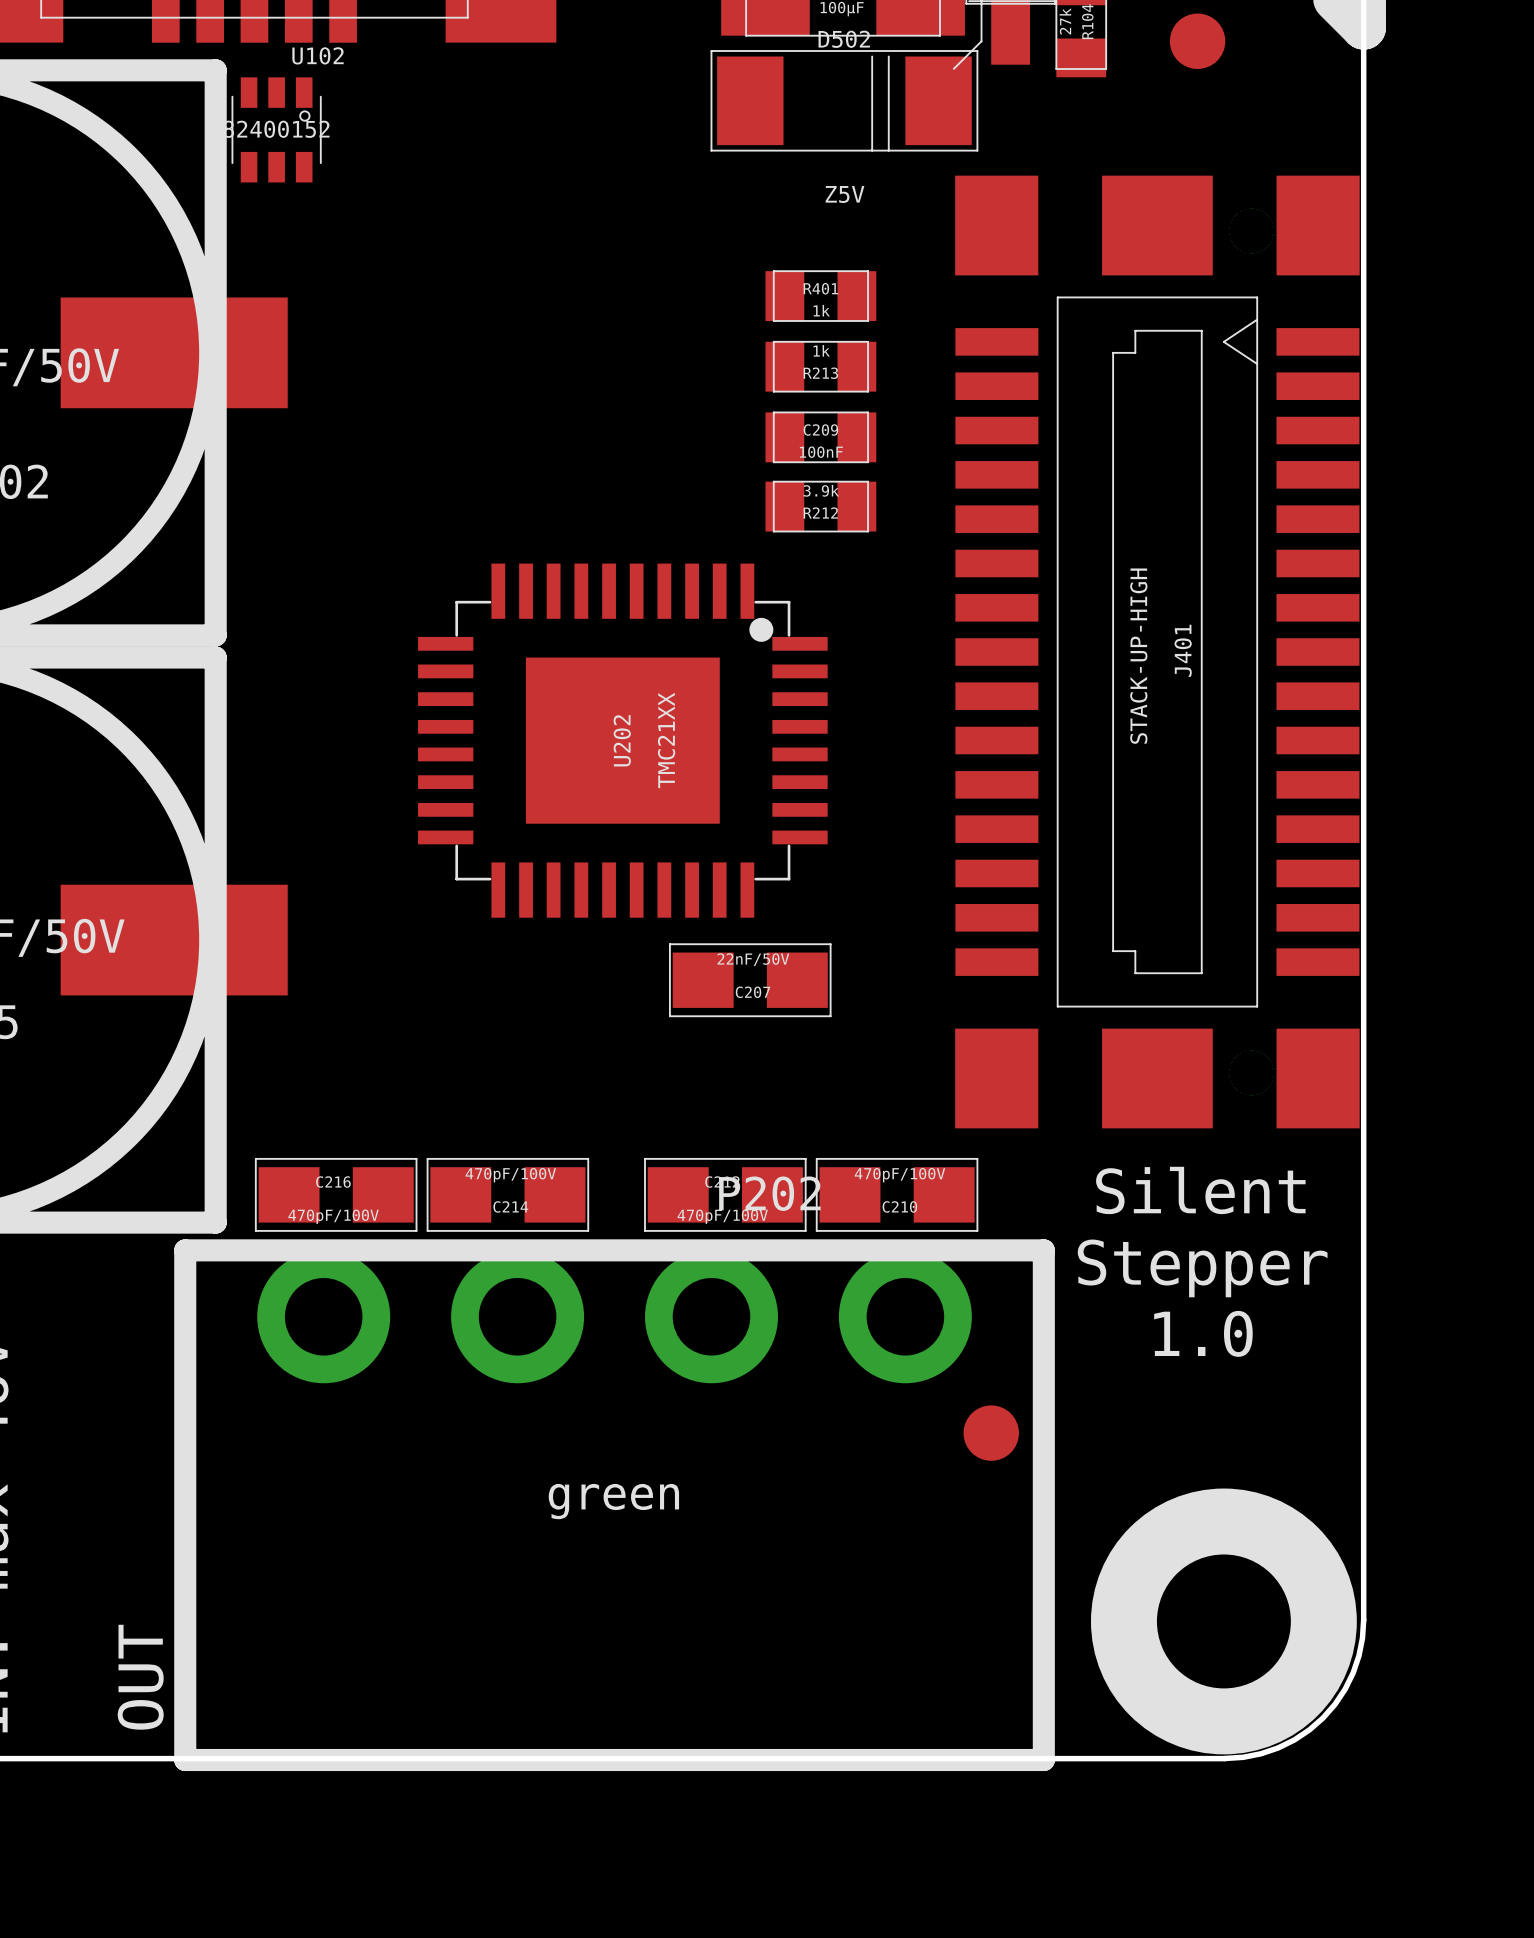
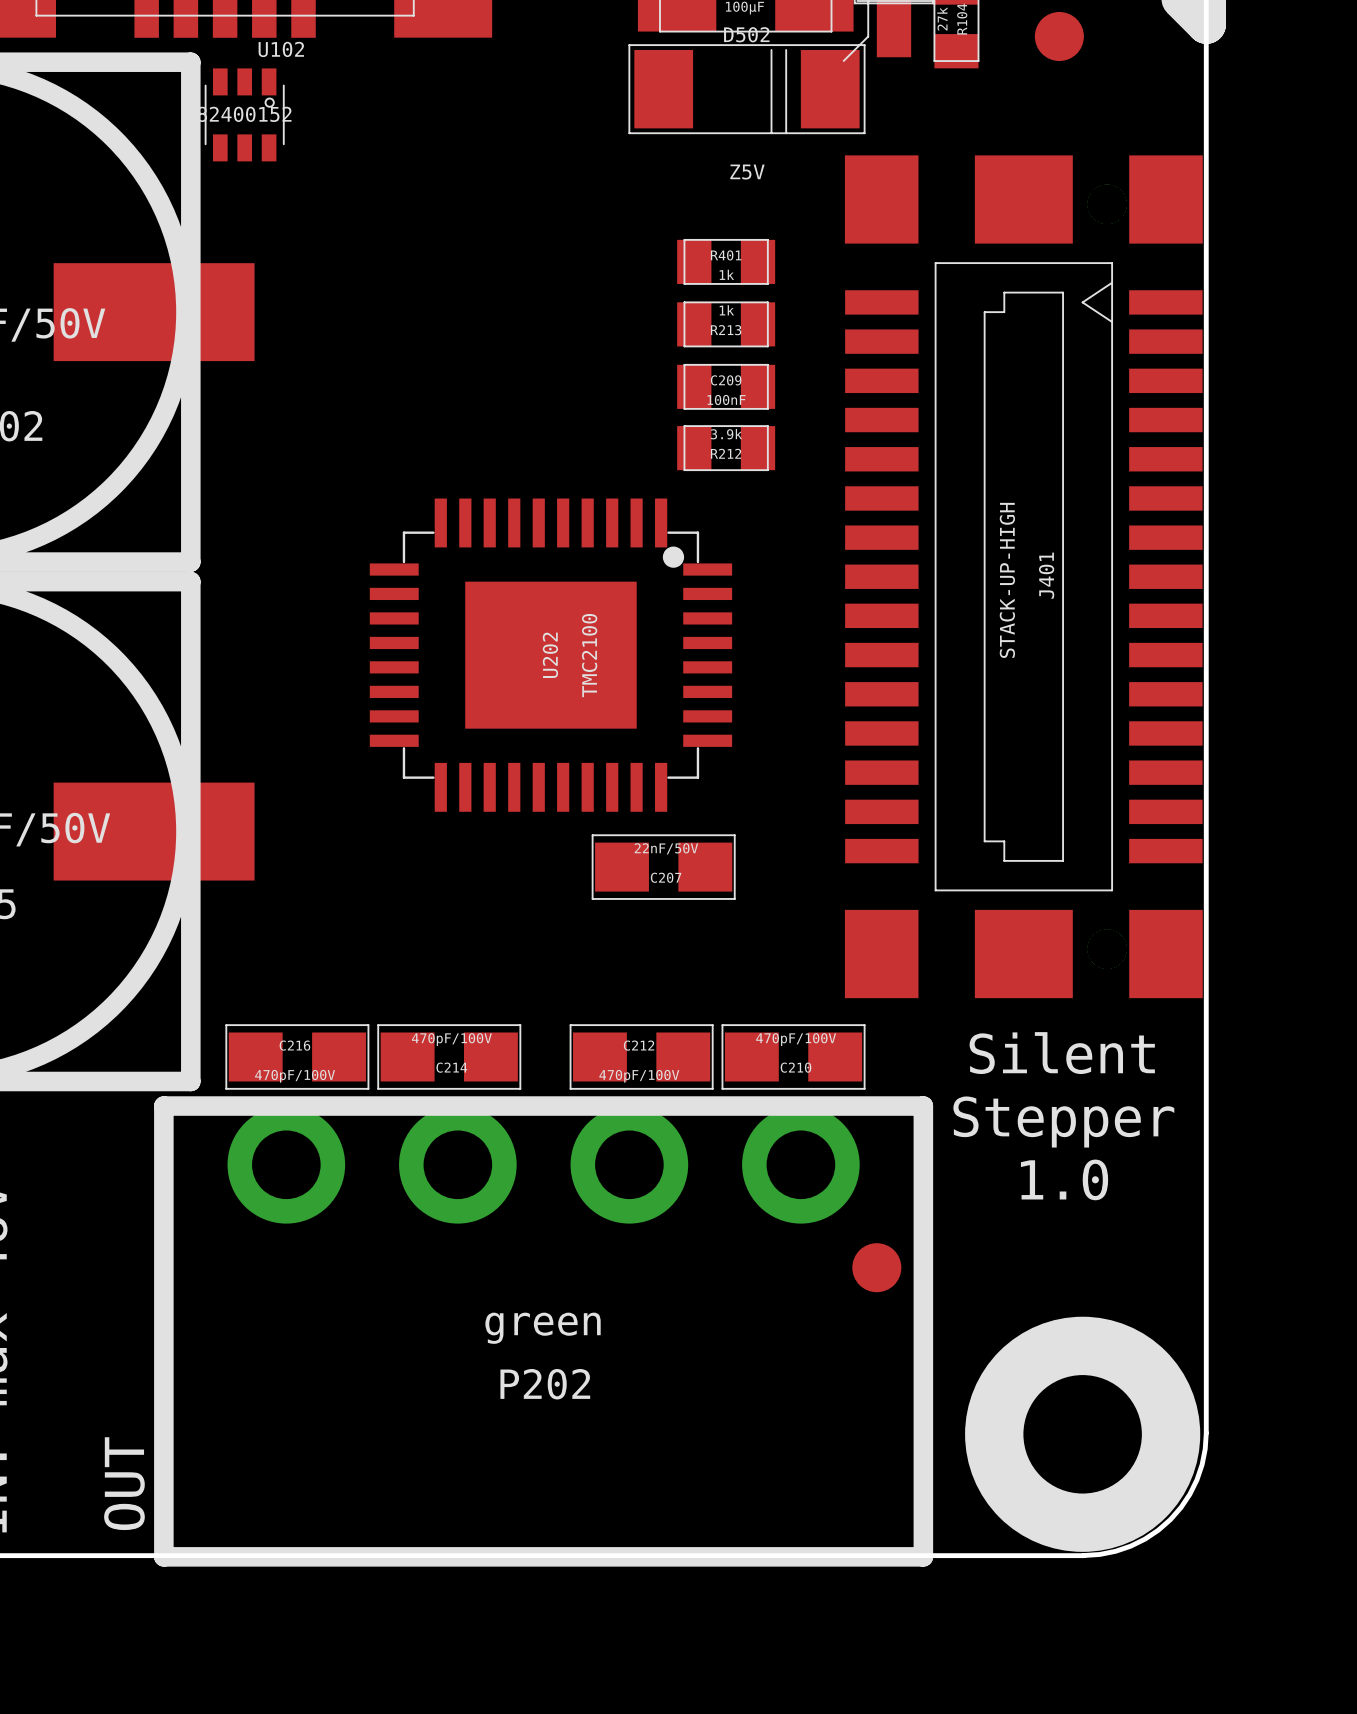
U202 value: TMC21XX (666, 740) -> TMC2100 (589, 655)
P202 name position: P202 (769, 1193) -> P202 (545, 1384)

